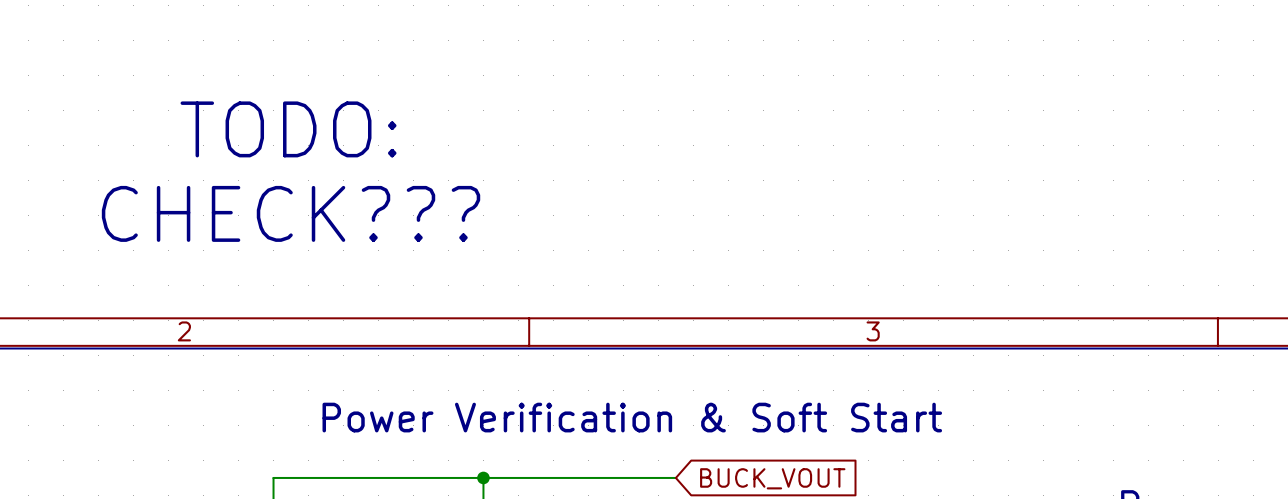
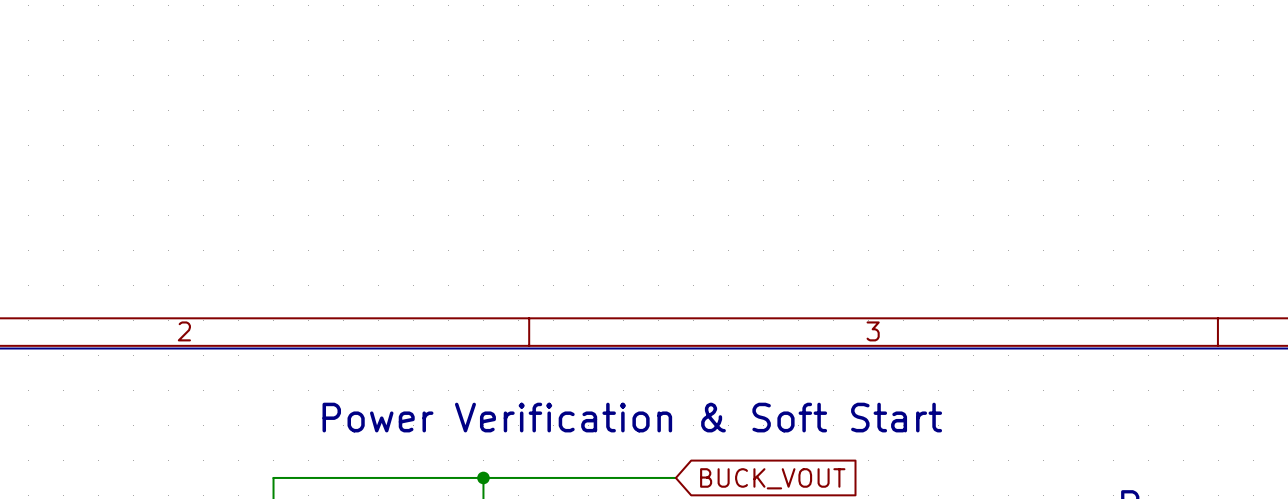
text: TODO: (288, 129) -> none
text: CHECK??? (291, 213) -> none

